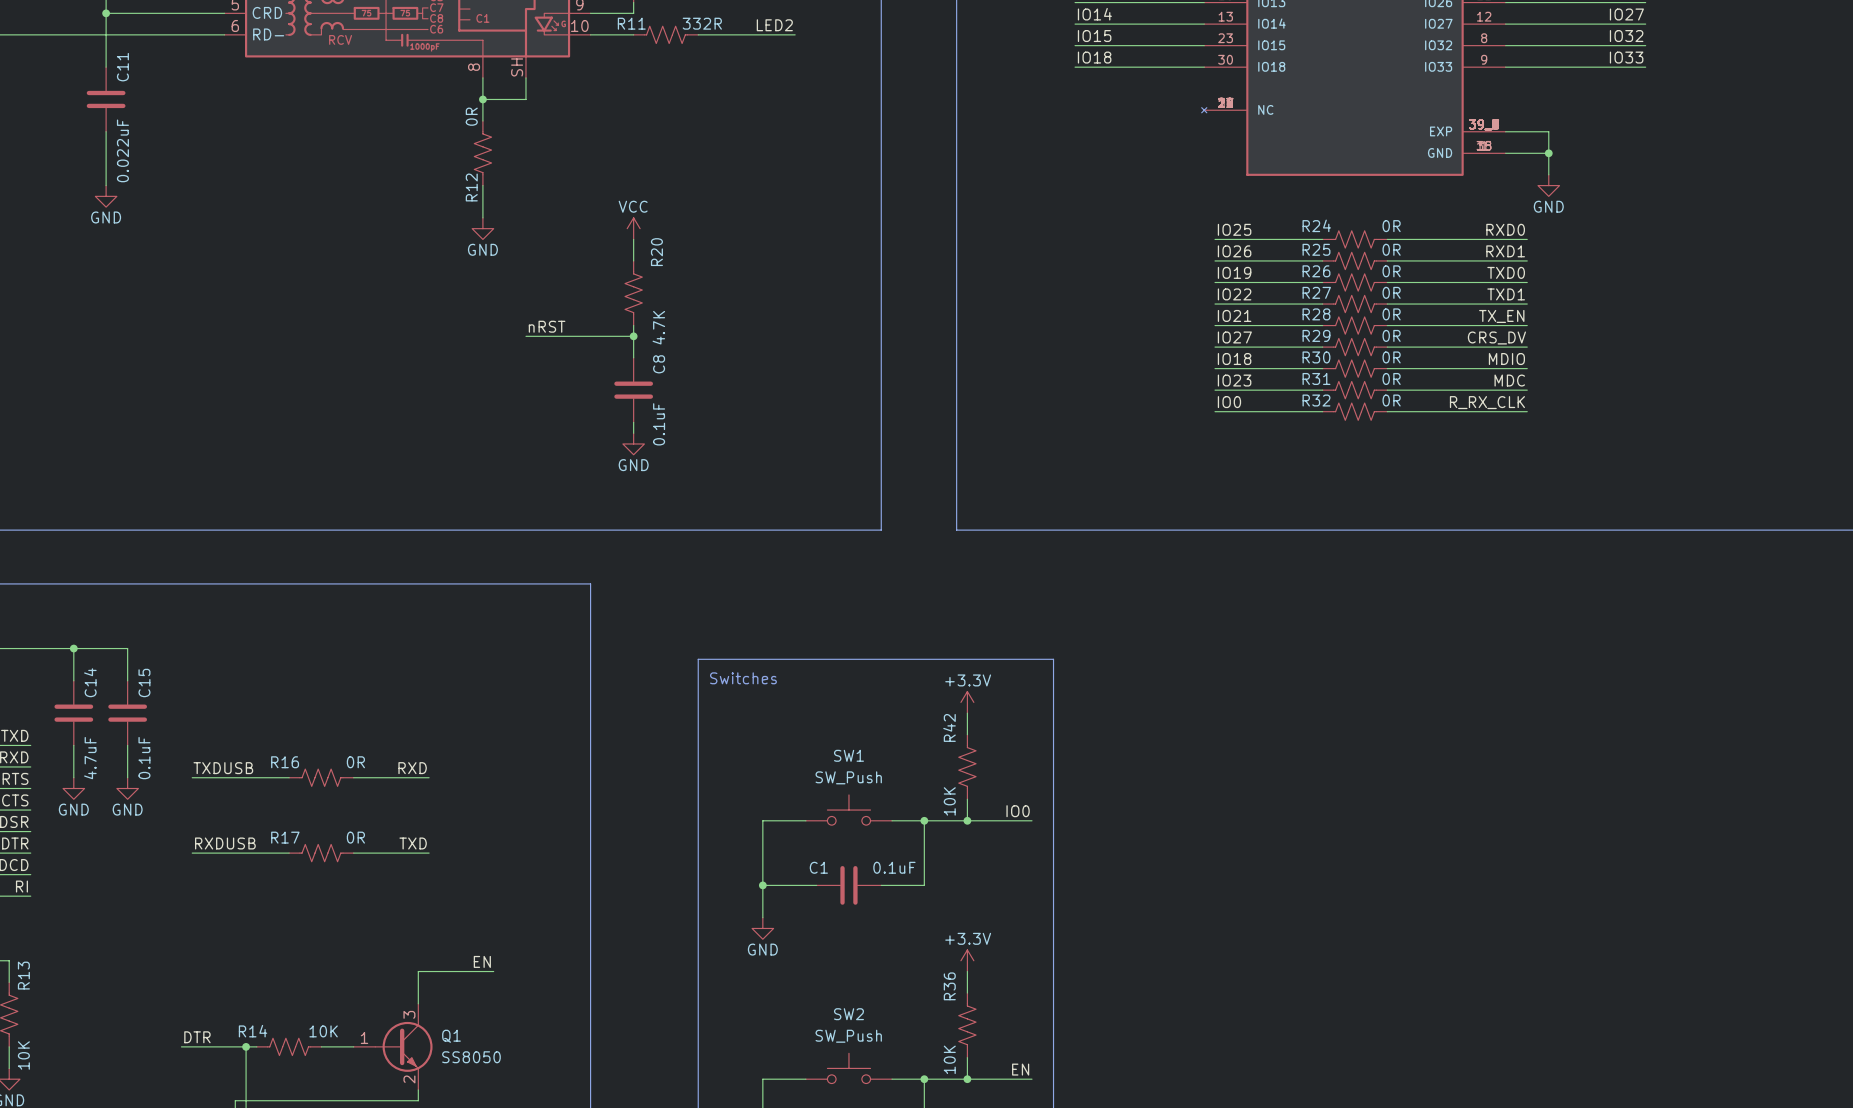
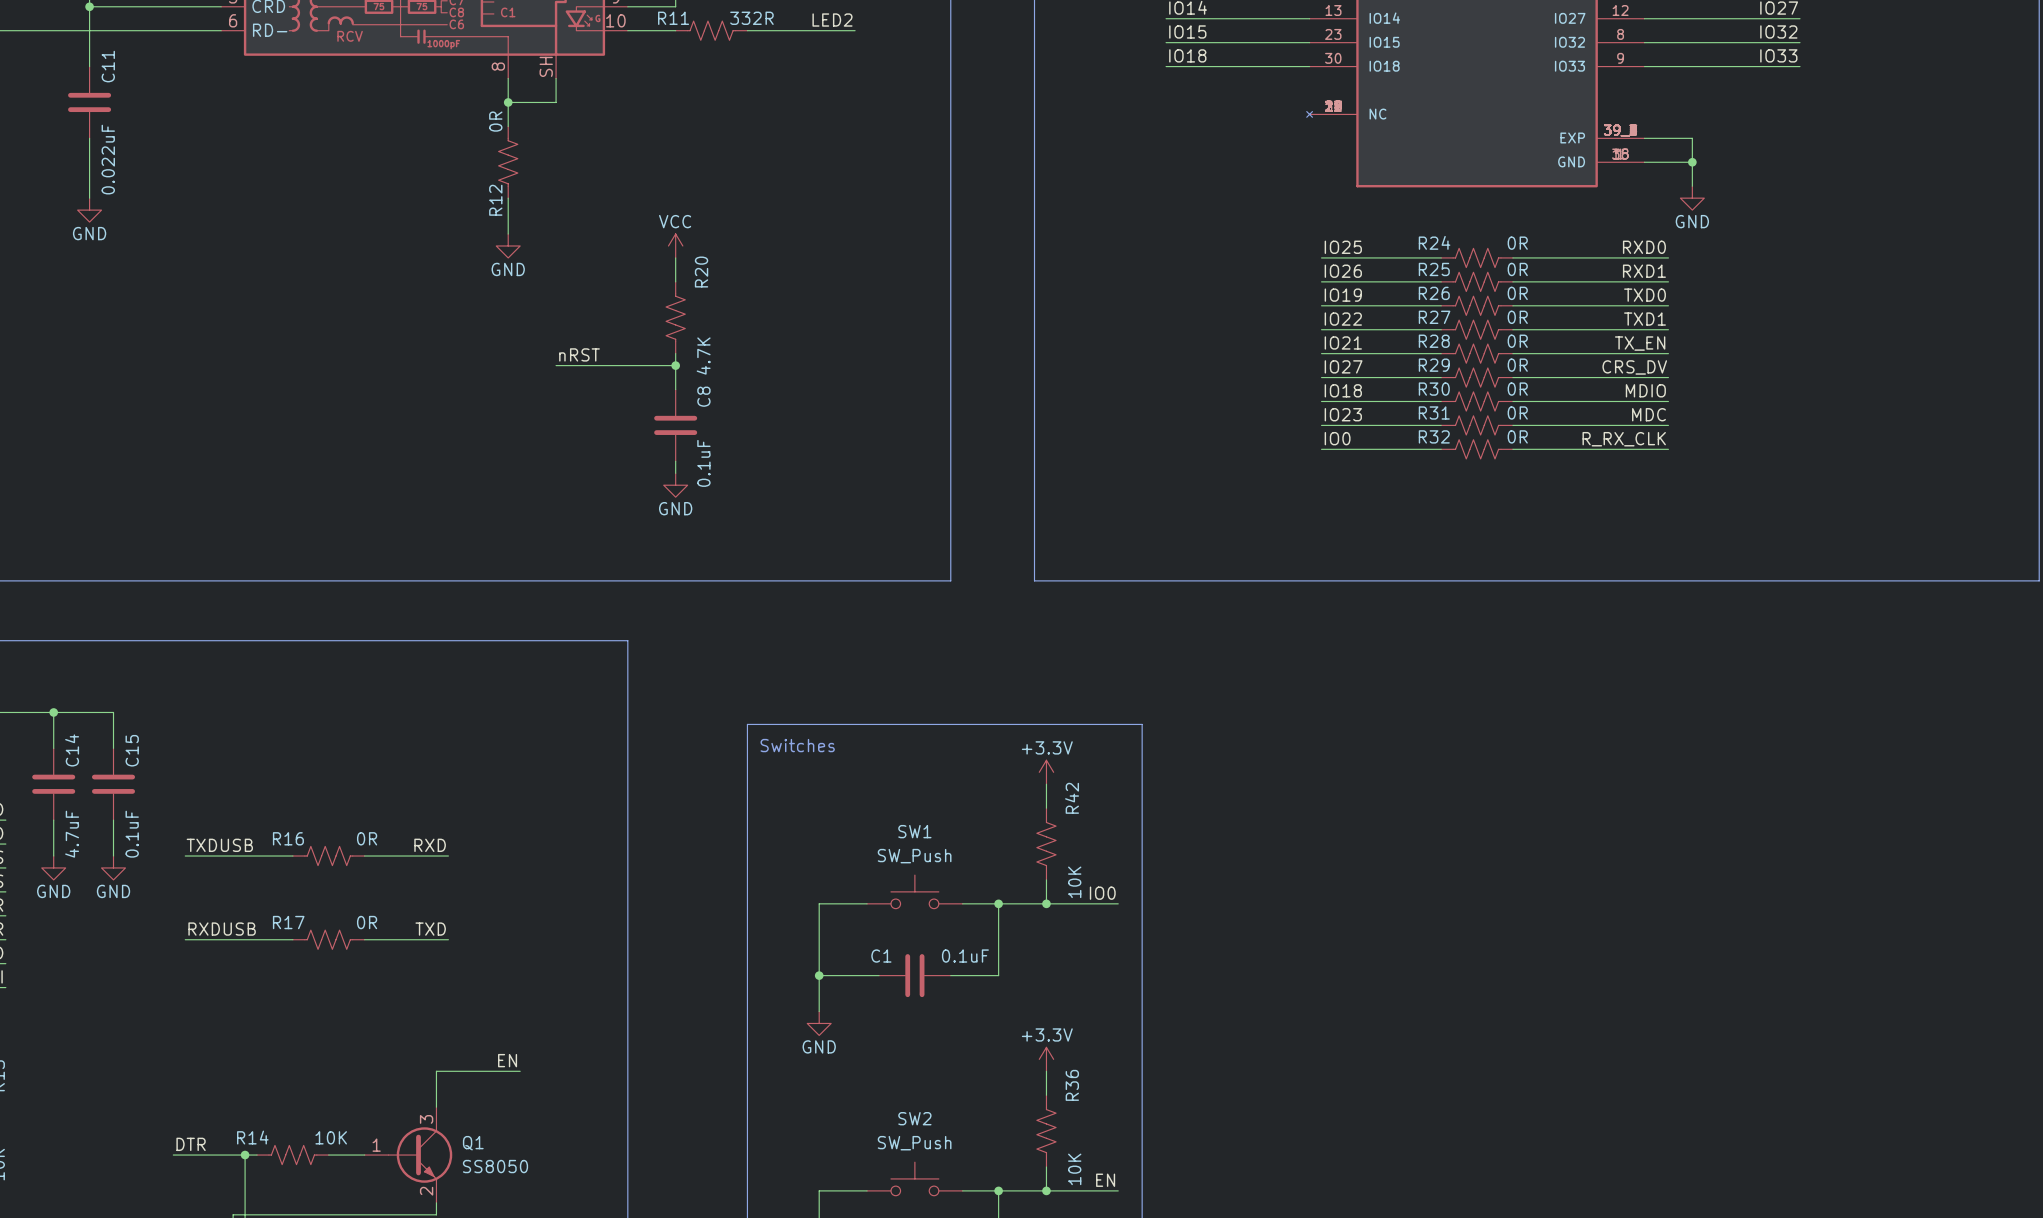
R42 name position: R42 (949, 727) -> R42 (1072, 798)
R42 value position: 10K (949, 801) -> 10K (1074, 882)
R36 name position: R36 (949, 986) -> R36 (1072, 1085)
R36 value position: 10K (949, 1059) -> 10K (1074, 1169)

